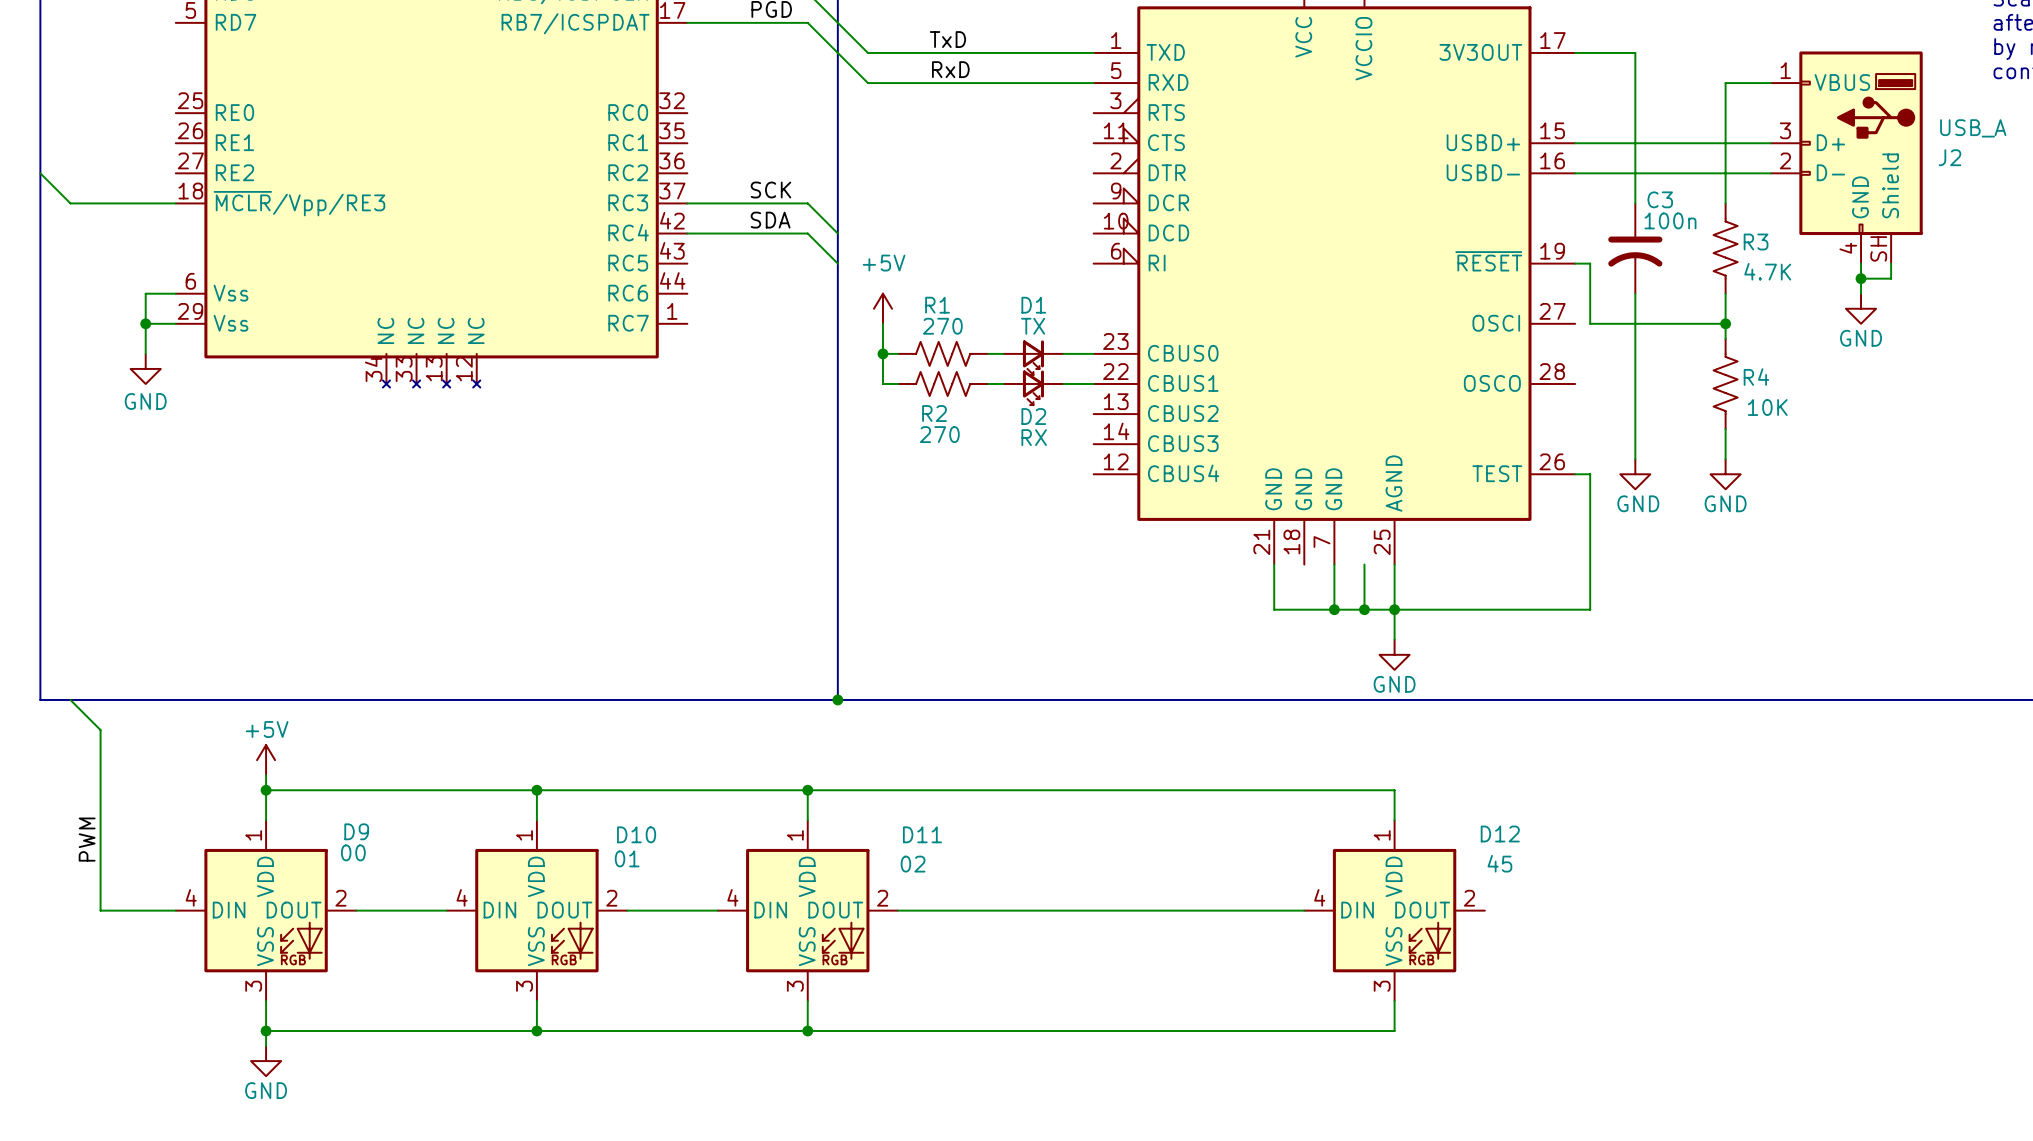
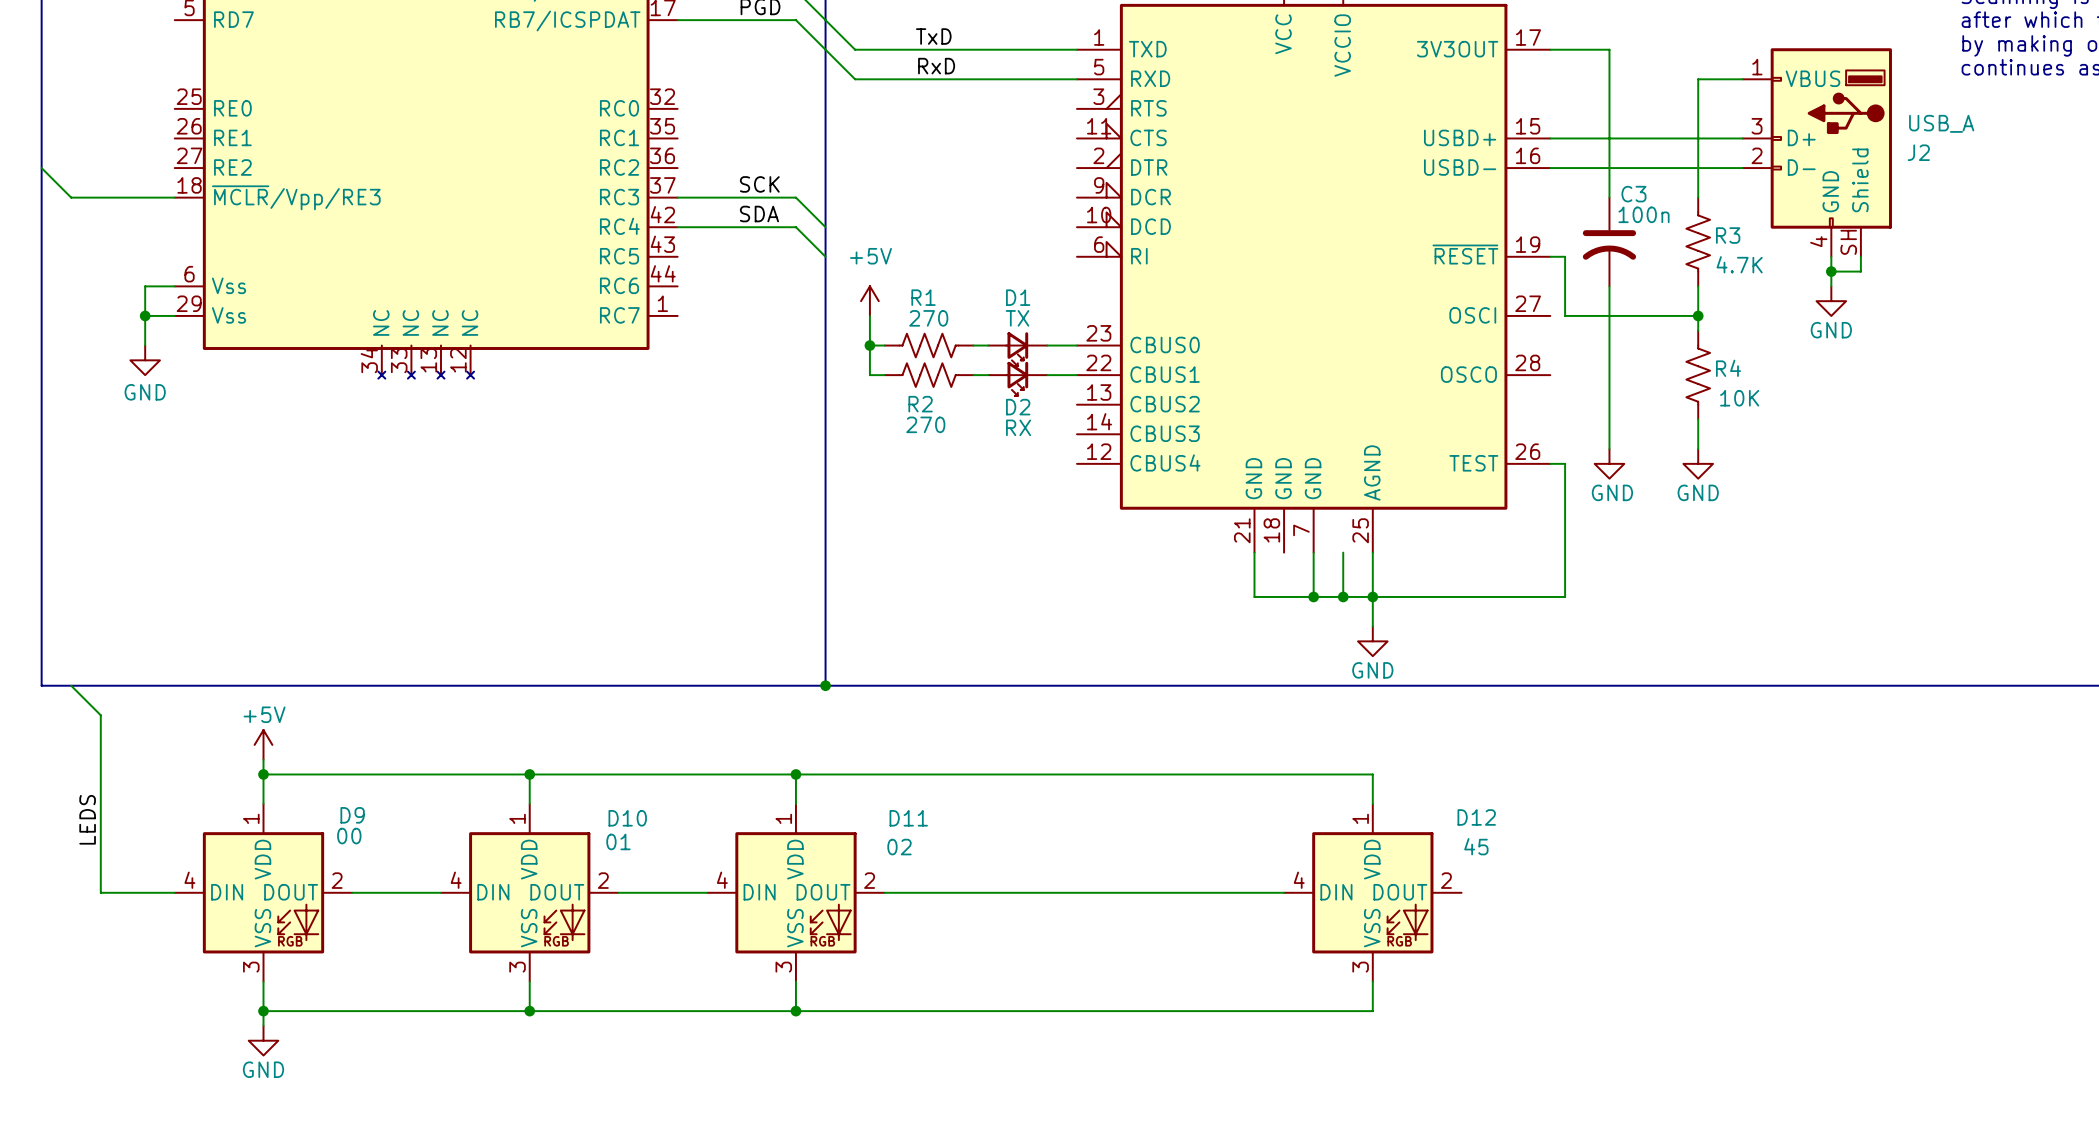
label: PWM (87, 839) -> LEDS (87, 819)

